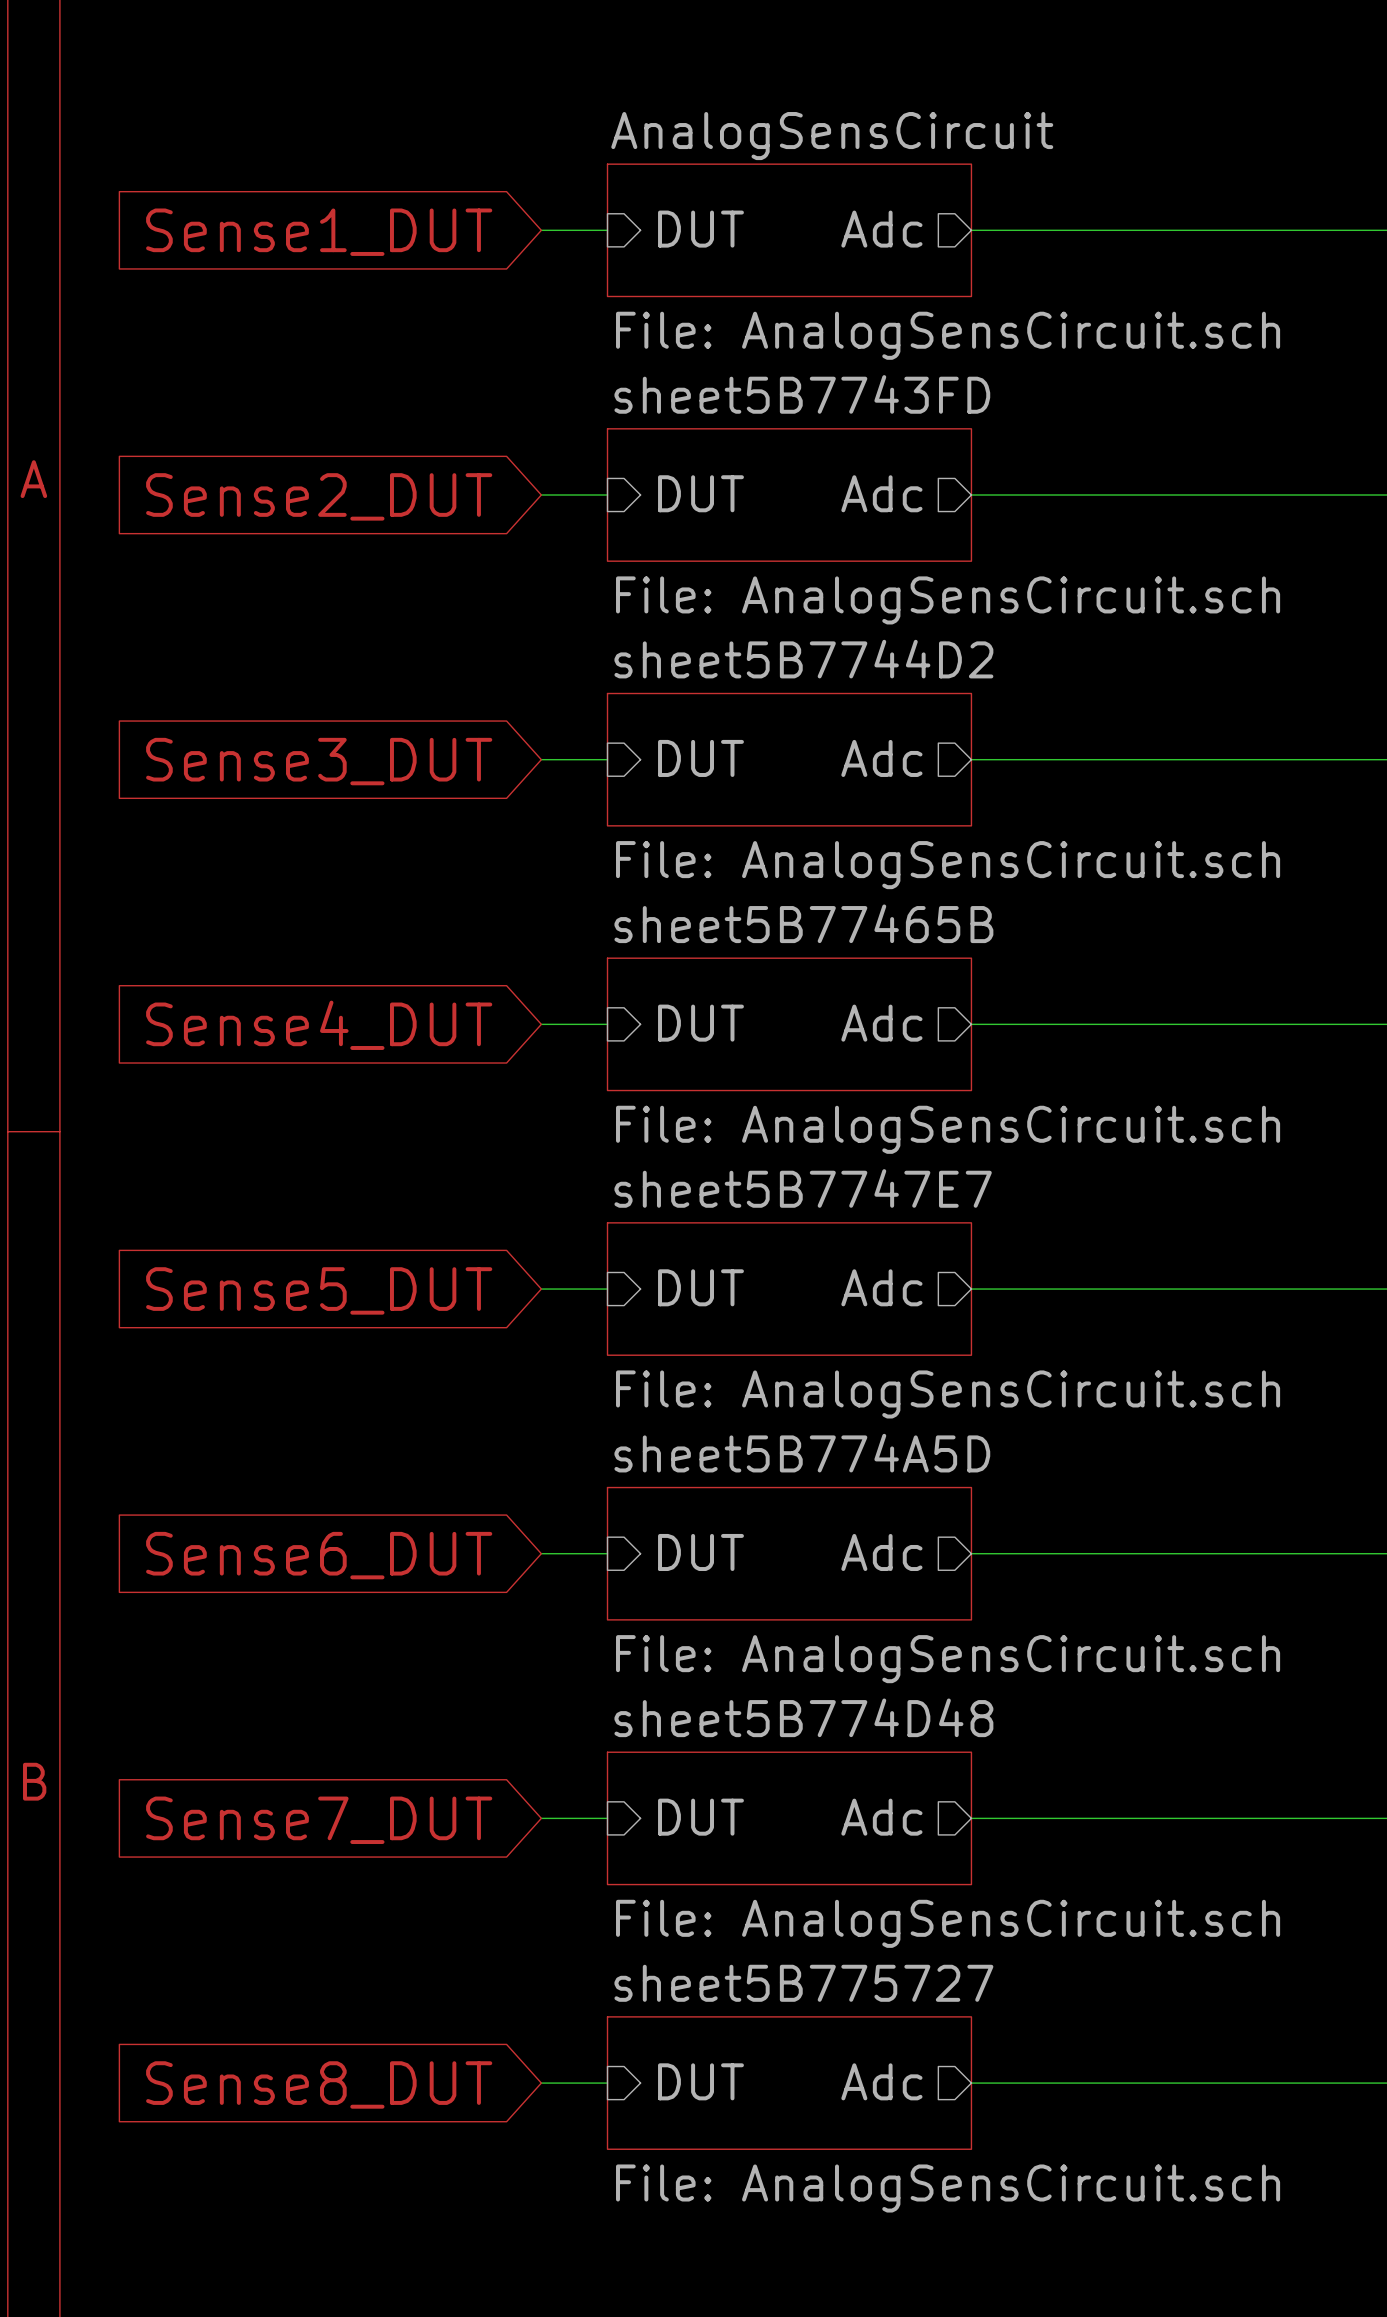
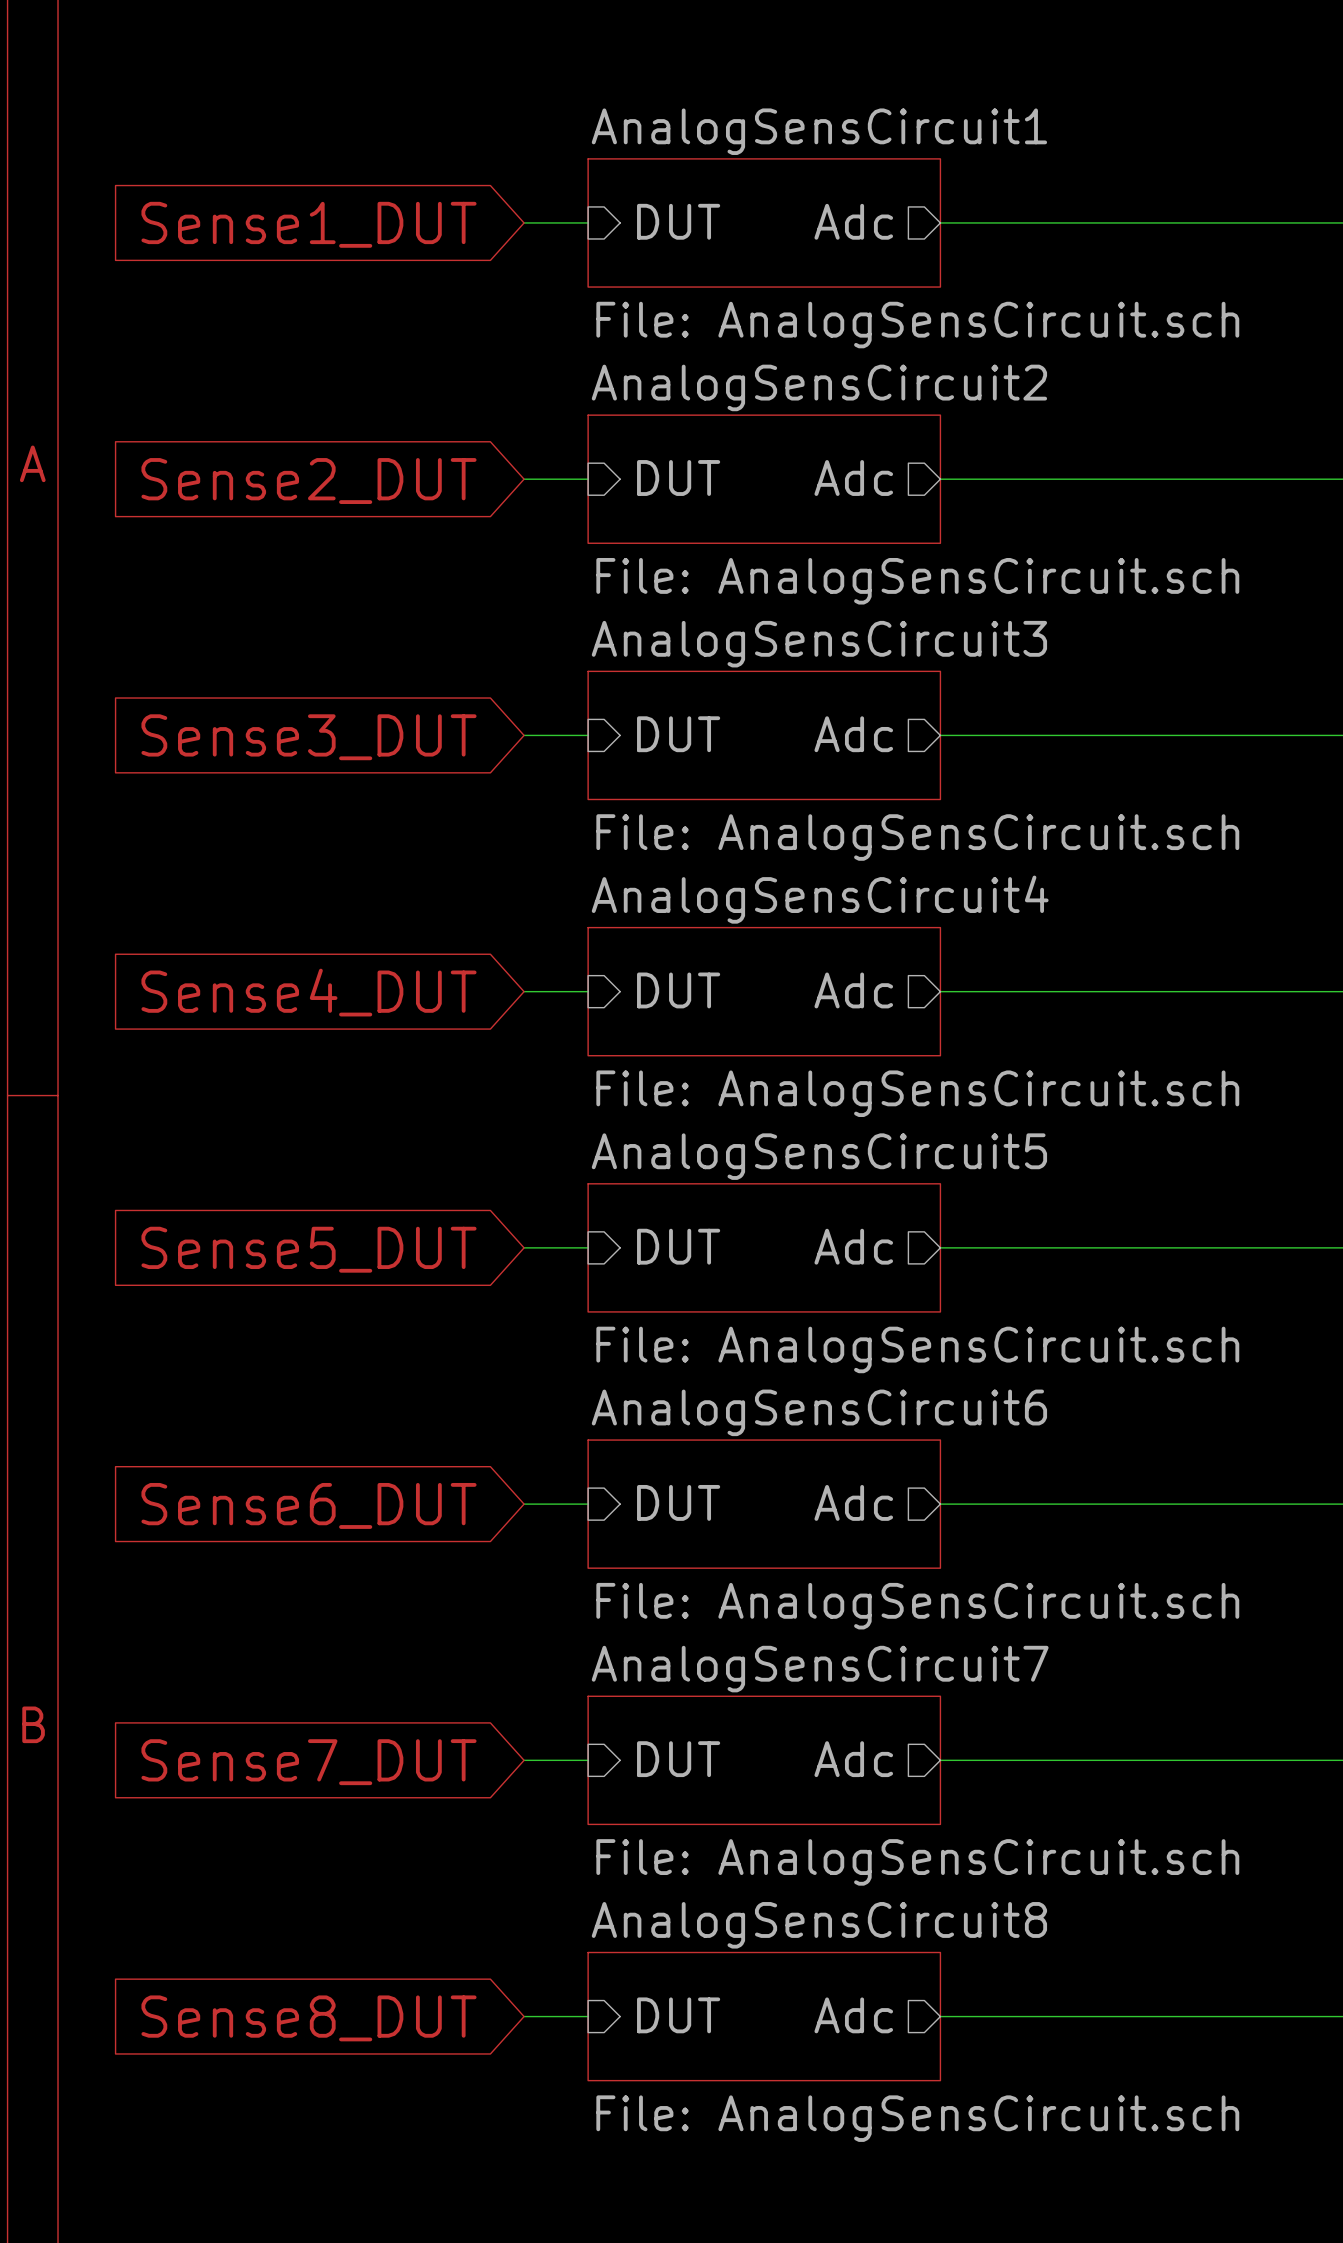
sheet AnalogSensCircuit name: AnalogSensCircuit (832, 136) -> AnalogSensCircuit1 (819, 131)
sheet sheet5B7743FD name: sheet5B7743FD (802, 394) -> AnalogSensCircuit2 (819, 387)
sheet sheet5B7744D2 name: sheet5B7744D2 (803, 659) -> AnalogSensCircuit3 (819, 644)
sheet sheet5B77465B name: sheet5B77465B (803, 923) -> AnalogSensCircuit4 (820, 899)
sheet sheet5B7747E7 name: sheet5B7747E7 (803, 1188) -> AnalogSensCircuit5 (819, 1156)
sheet sheet5B774A5D name: sheet5B774A5D (802, 1453) -> AnalogSensCircuit6 (819, 1412)
sheet sheet5B774D48 name: sheet5B774D48 (803, 1717) -> AnalogSensCircuit7 (820, 1669)
sheet sheet5B775727 name: sheet5B775727 (803, 1983) -> AnalogSensCircuit8 (819, 1925)

